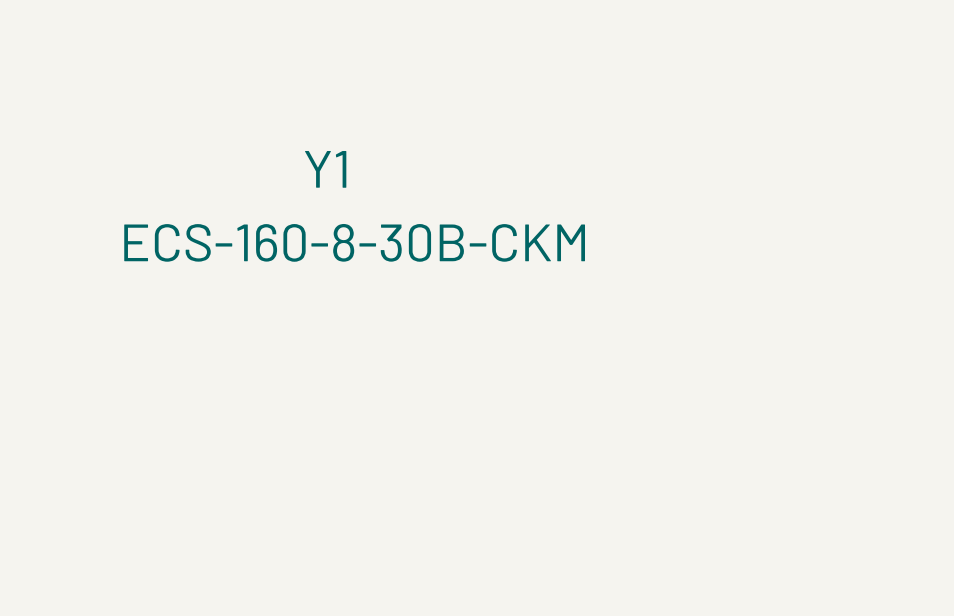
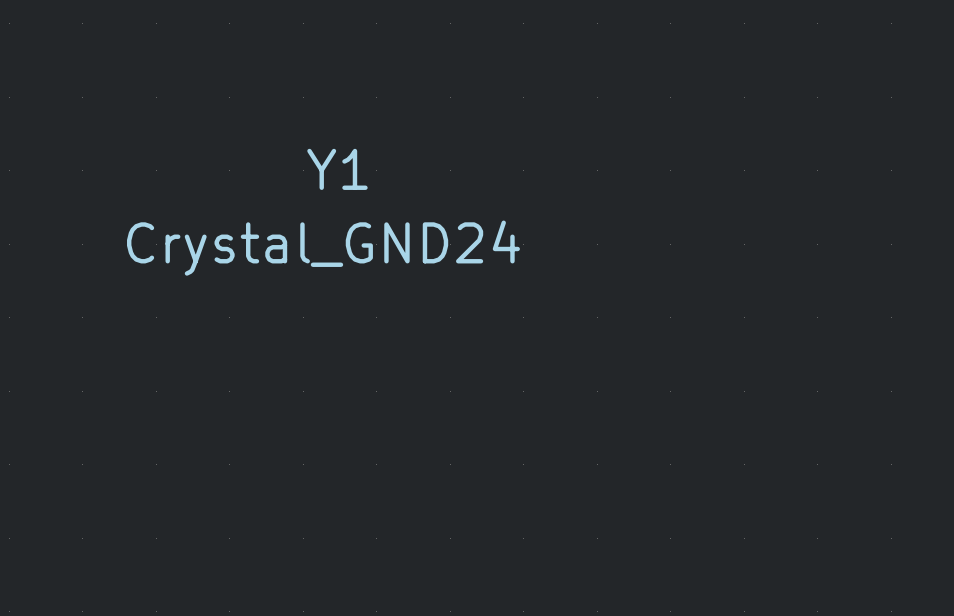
Y1 value: ECS-160-8-30B-CKM (354, 242) -> Crystal_GND24 (323, 248)

